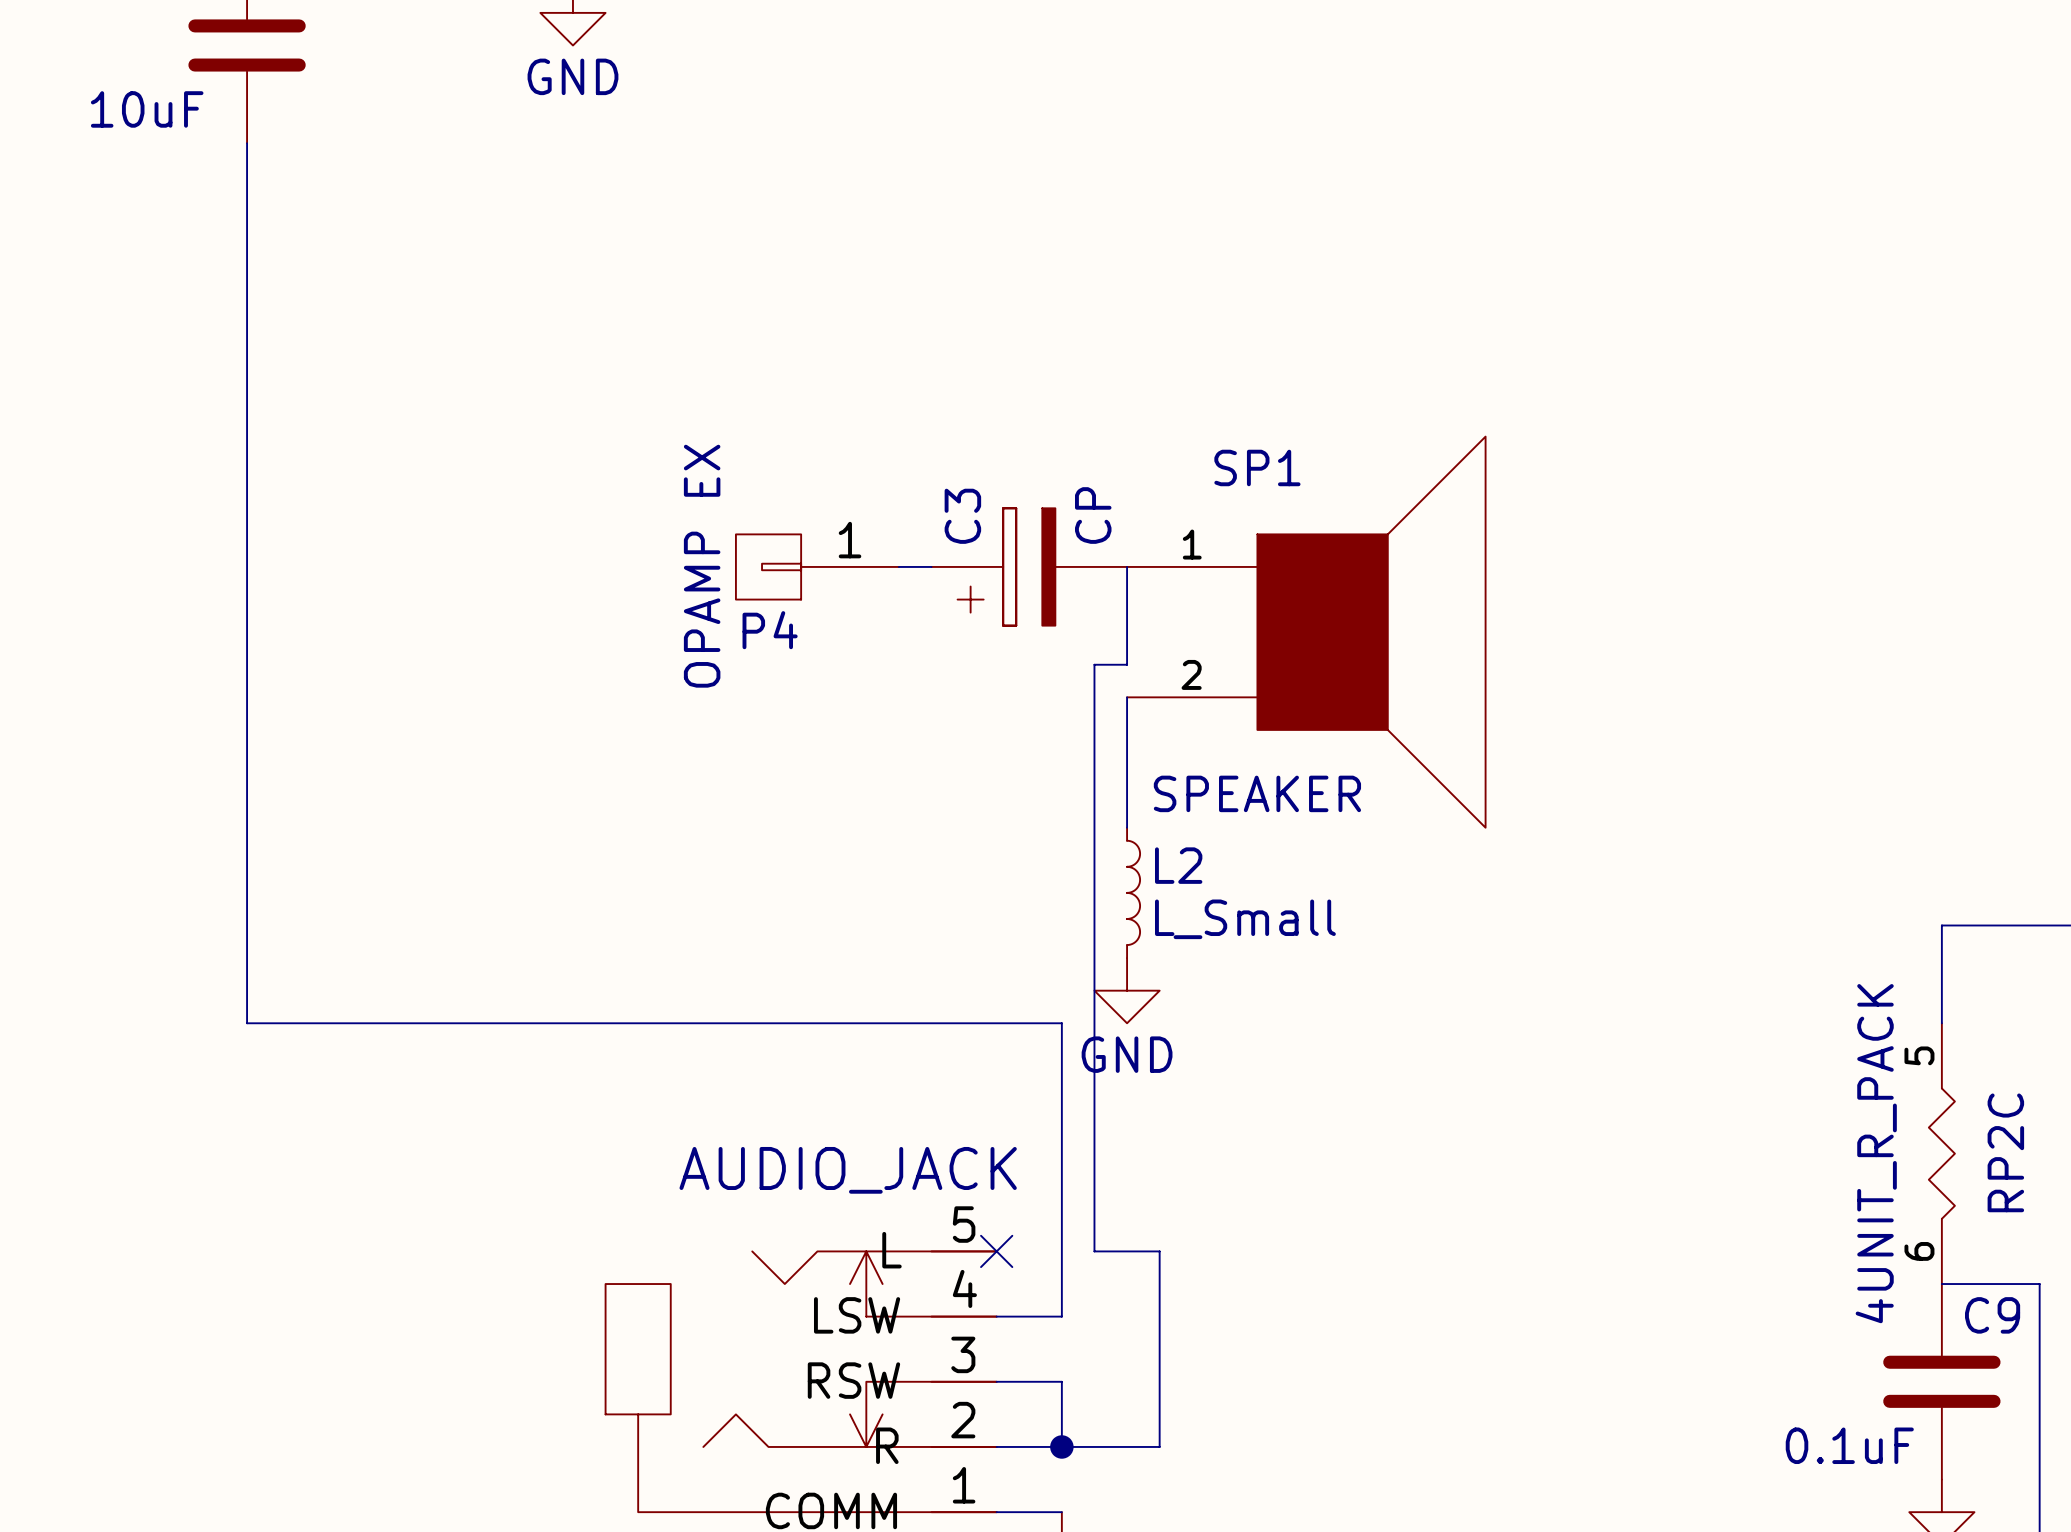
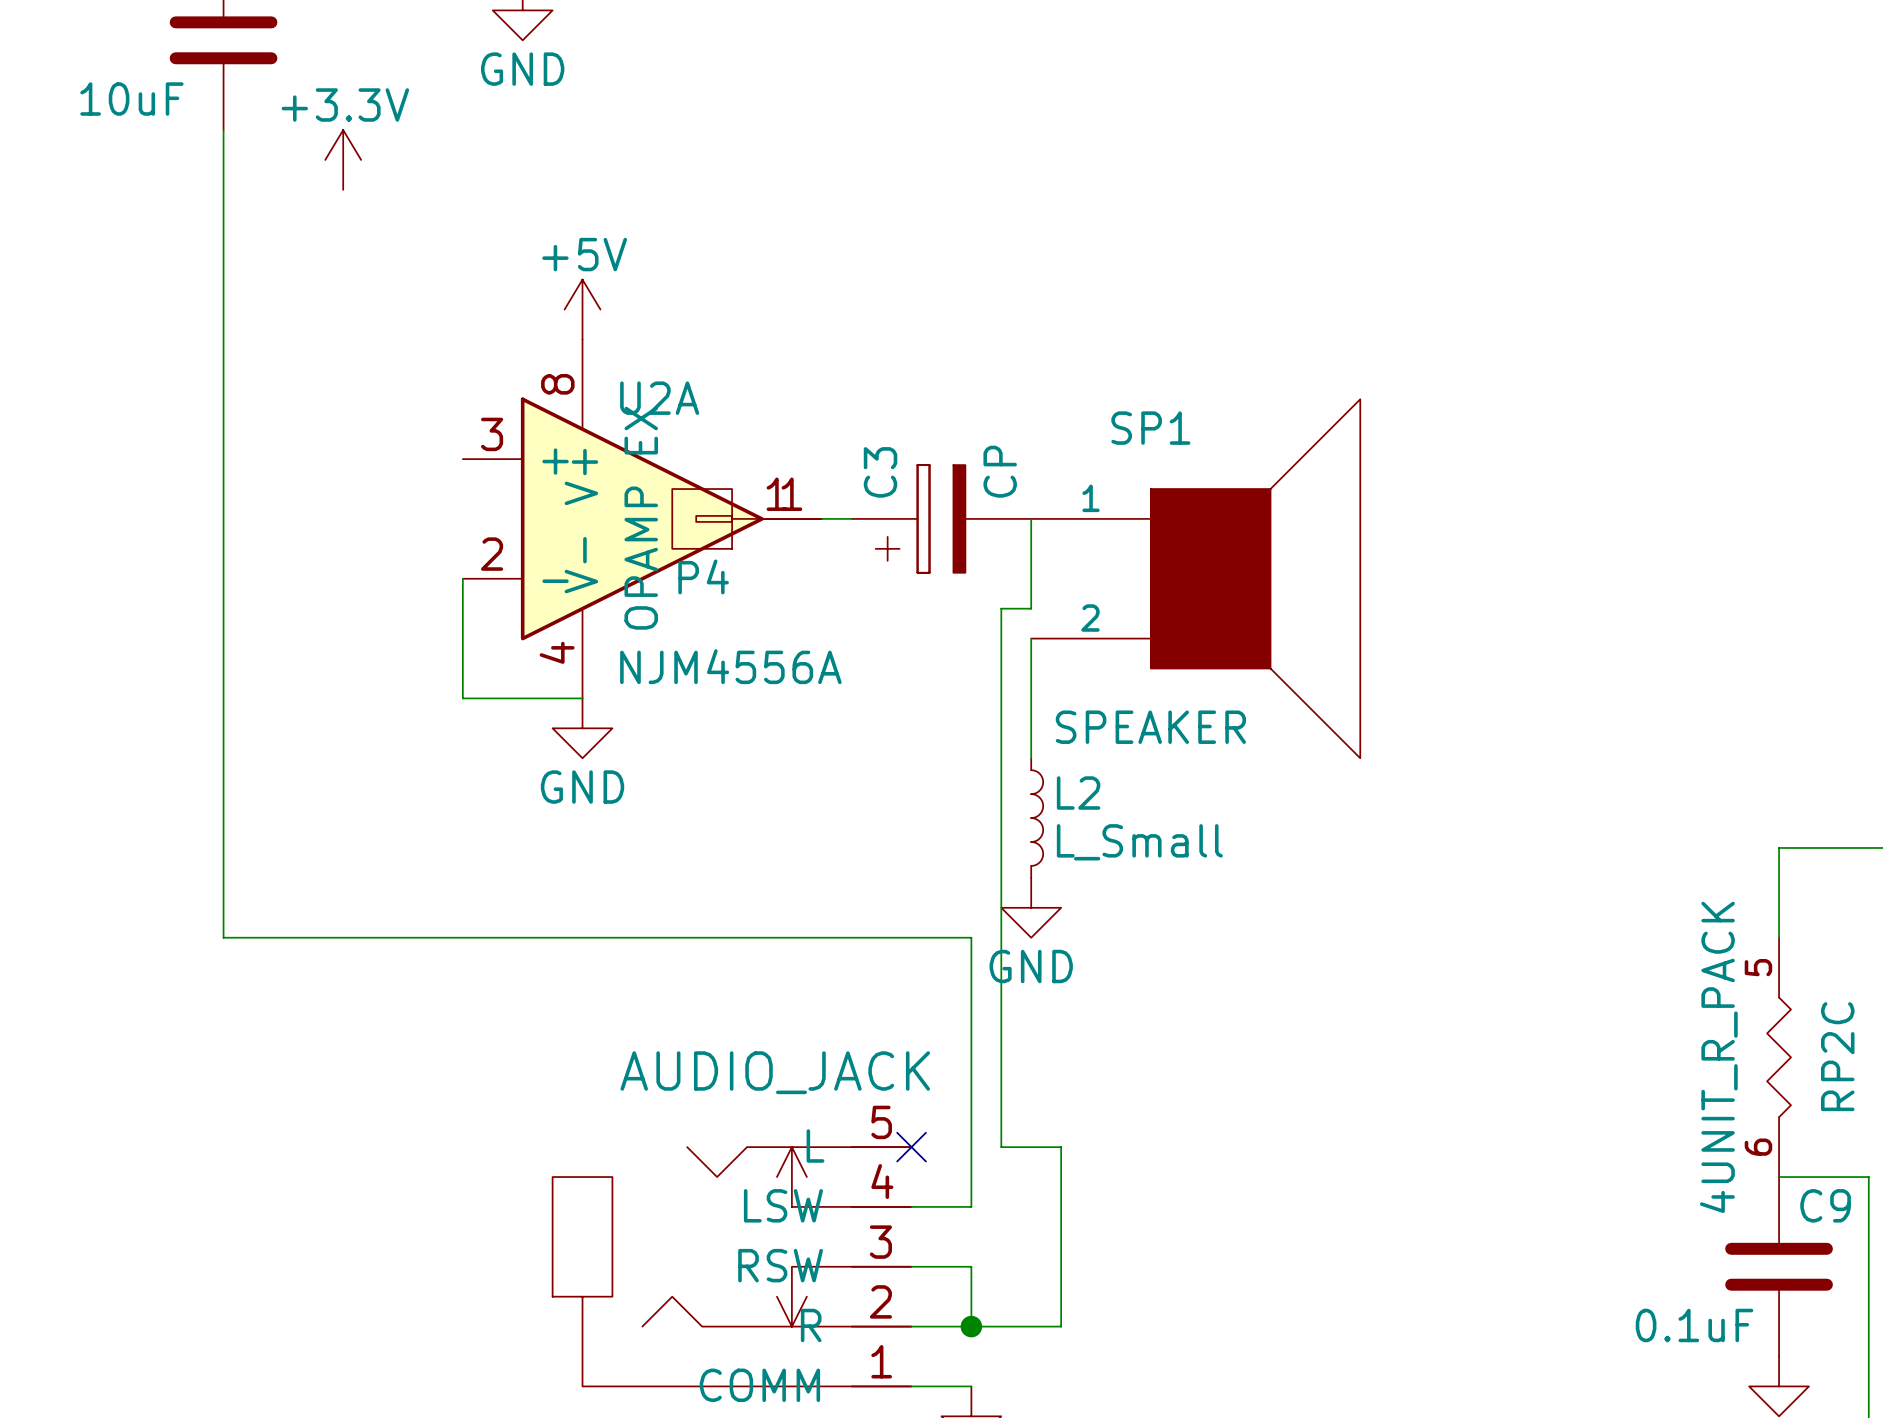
power symbol: none -> +3.3V (343, 159)
power symbol: none -> +5V (582, 309)
U2A: none -> NJM4556A (642, 518)
wire: none -> (462, 578) (462, 698) (582, 698)
power symbol: none -> GND (582, 728)

